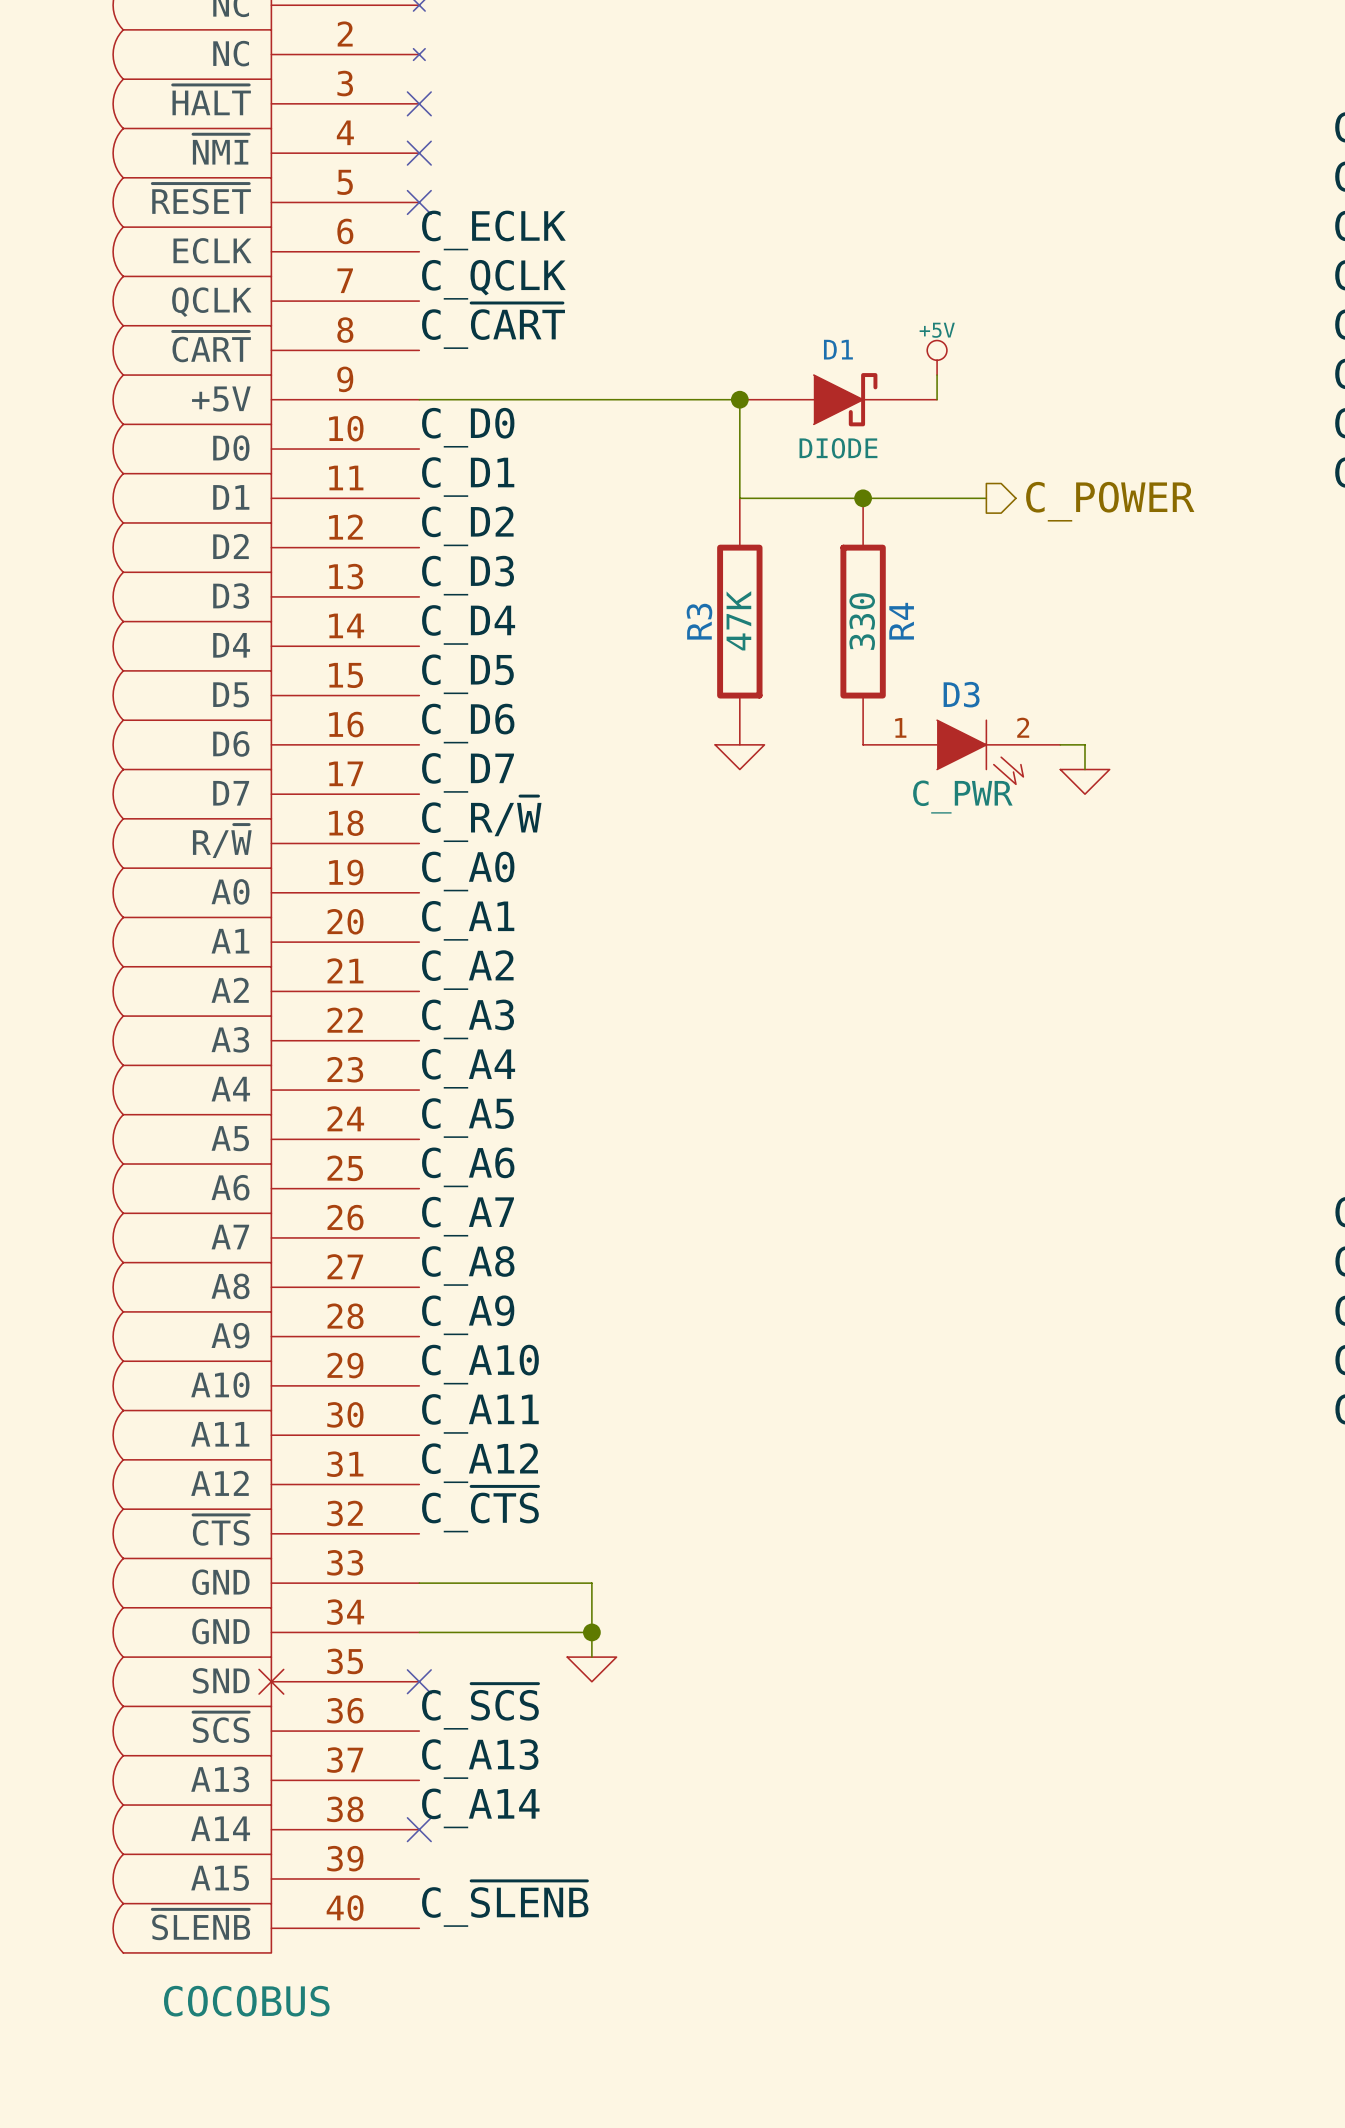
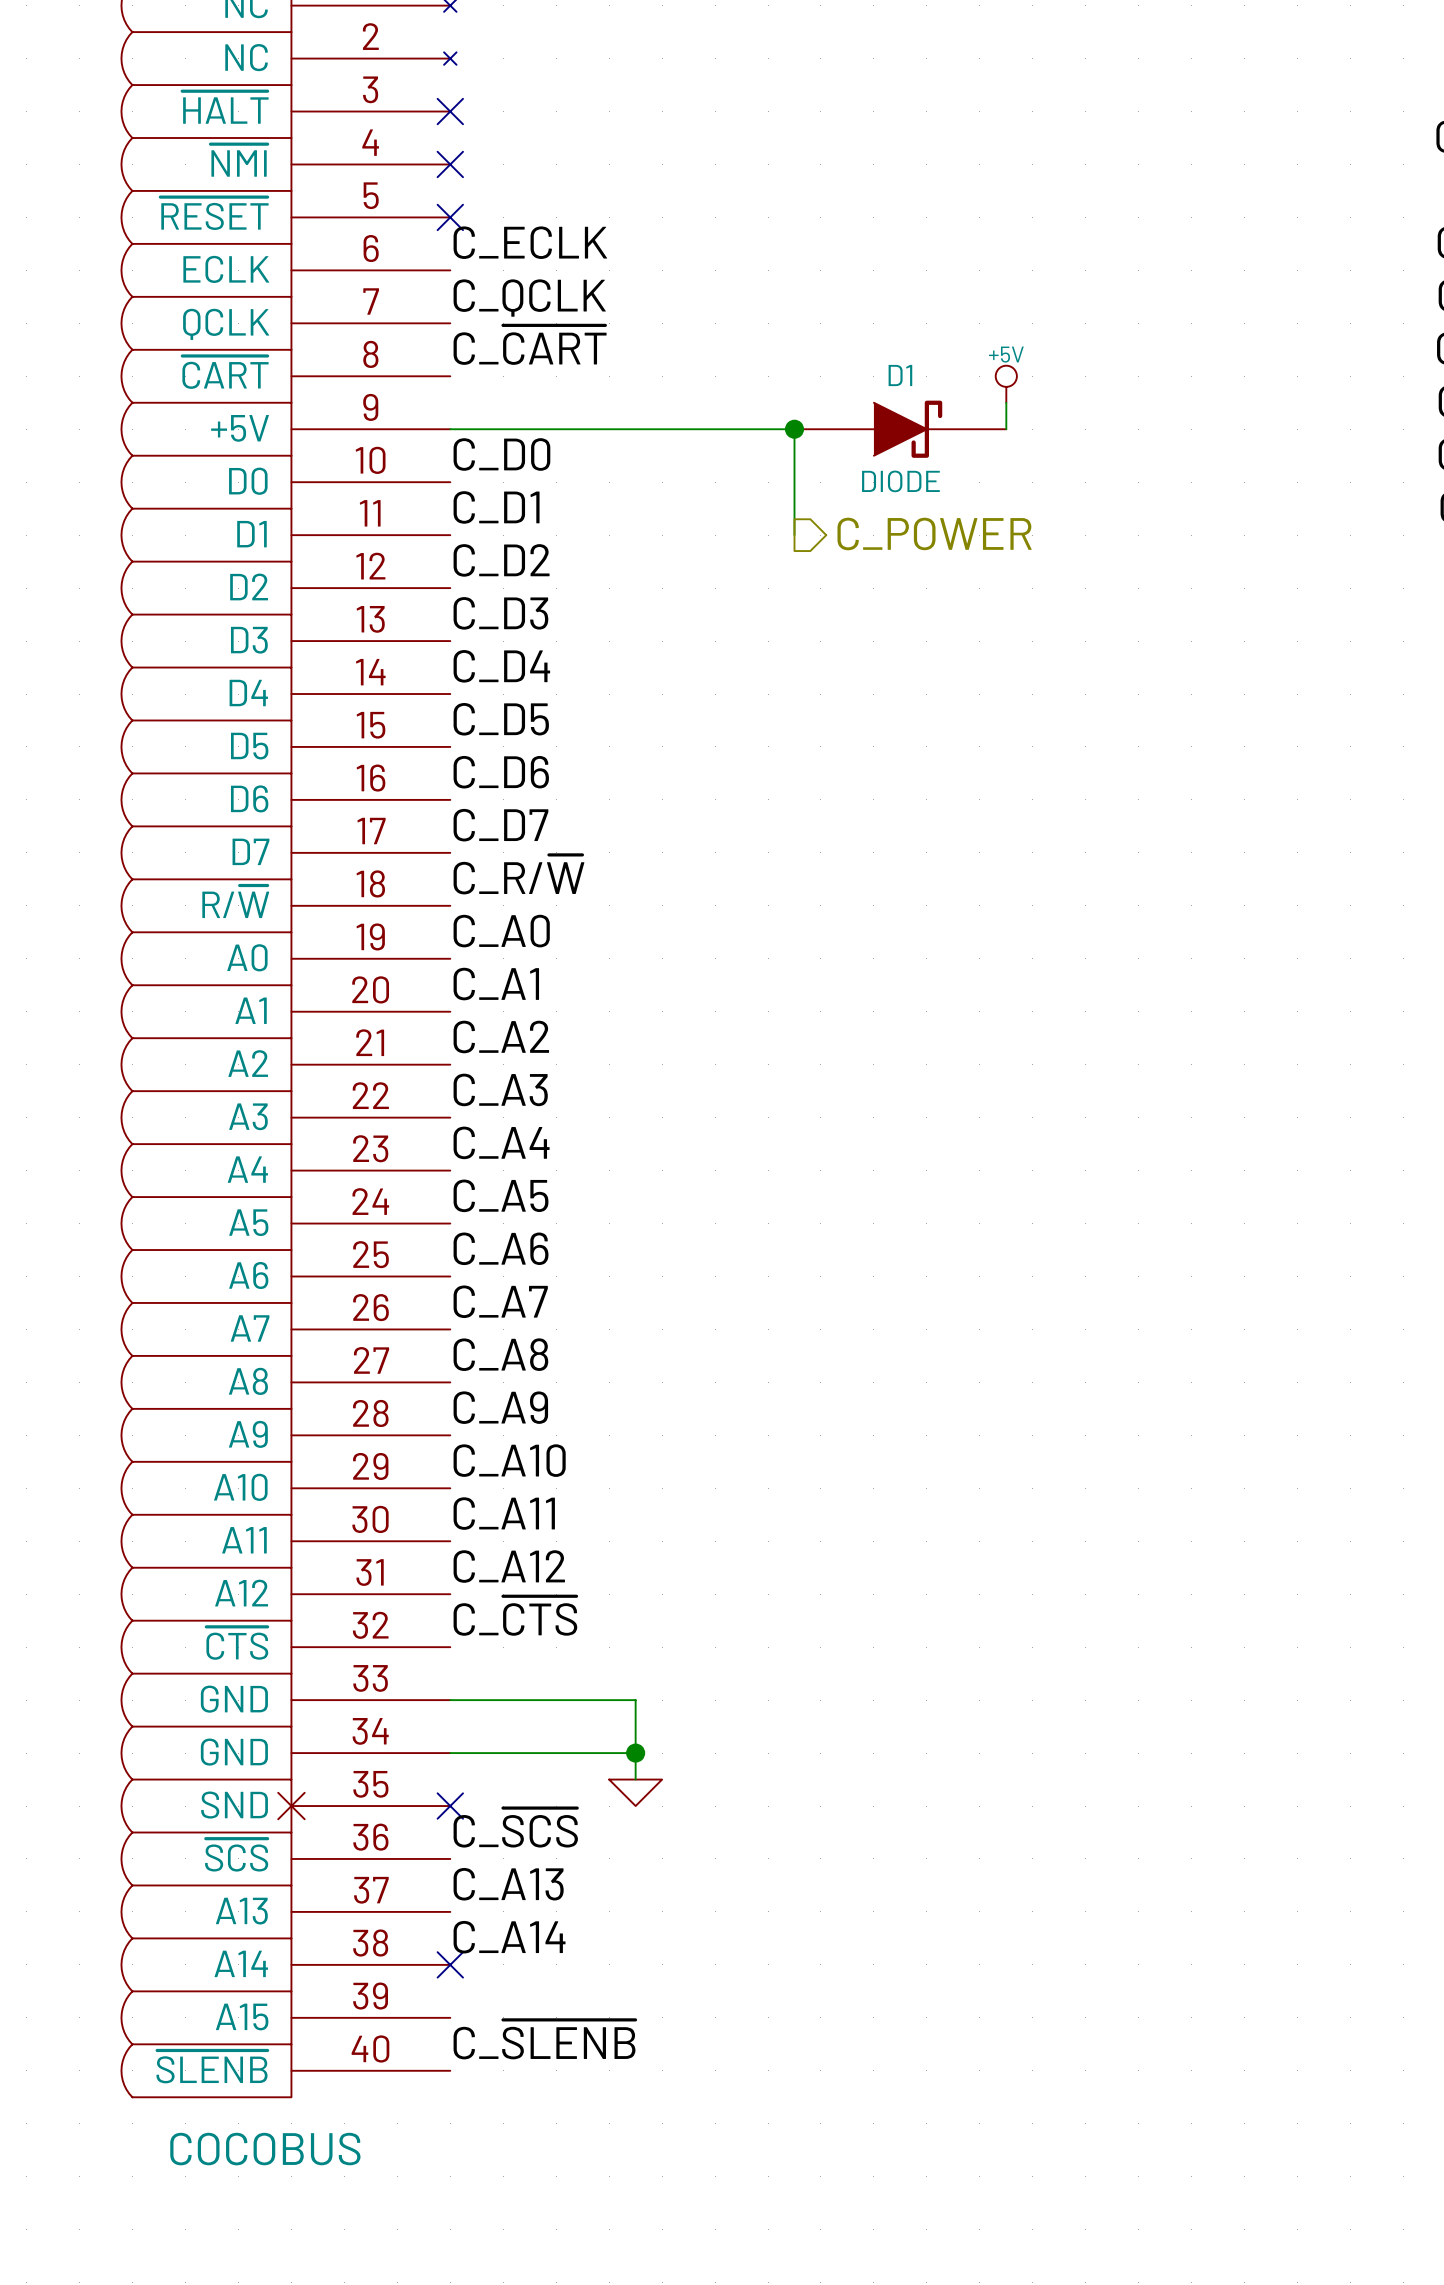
wire: (739, 498) (986, 498) -> none
junction: (863, 498) -> none
hierarchical label position: C_POWER (1110, 501) -> C_POWER (934, 533)
R3: 47K (739, 621) -> none
R4: 330 (863, 621) -> none
wire: (1060, 744) (1084, 744) (1084, 769) -> none
D3: C_PWR (961, 752) -> none
power symbol: (739, 757) -> none
power symbol: (1084, 781) -> none

